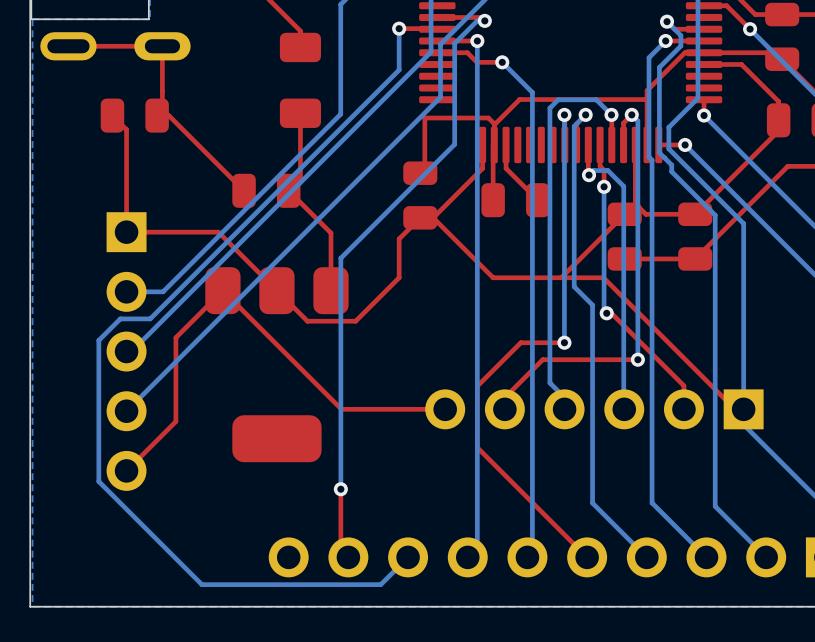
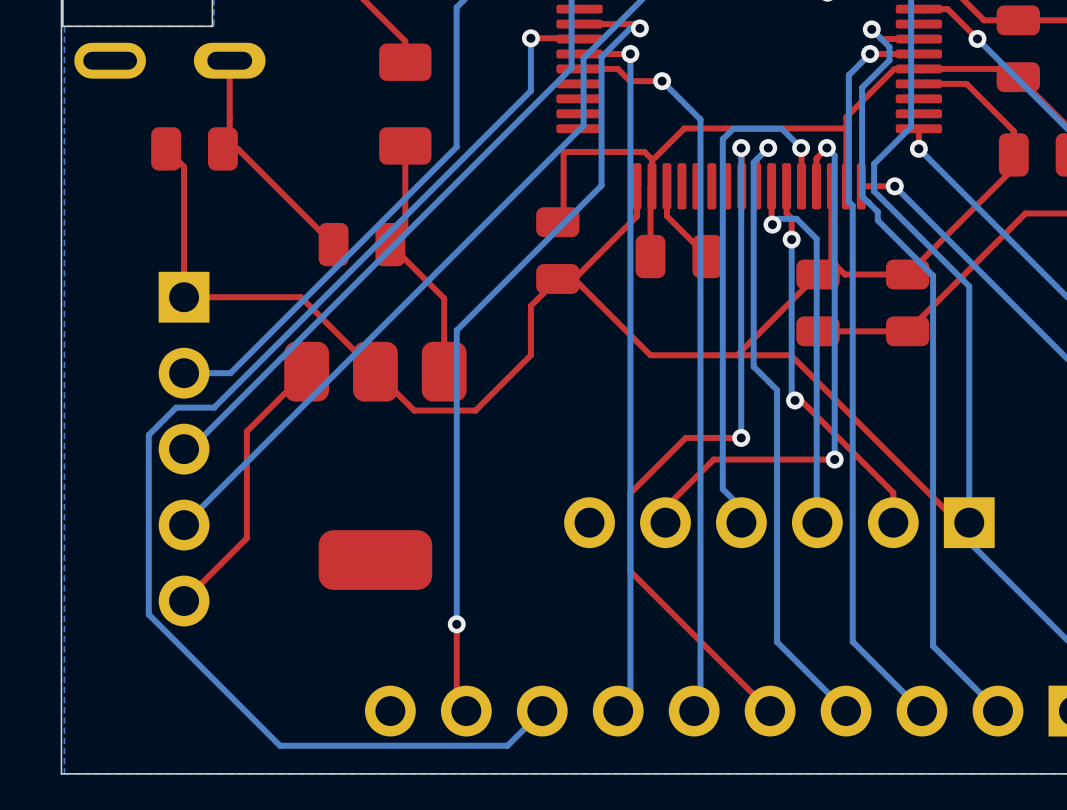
top track: (162, 46) (68, 46) -> none
top track: (222, 290) (341, 409) (445, 409) -> none

